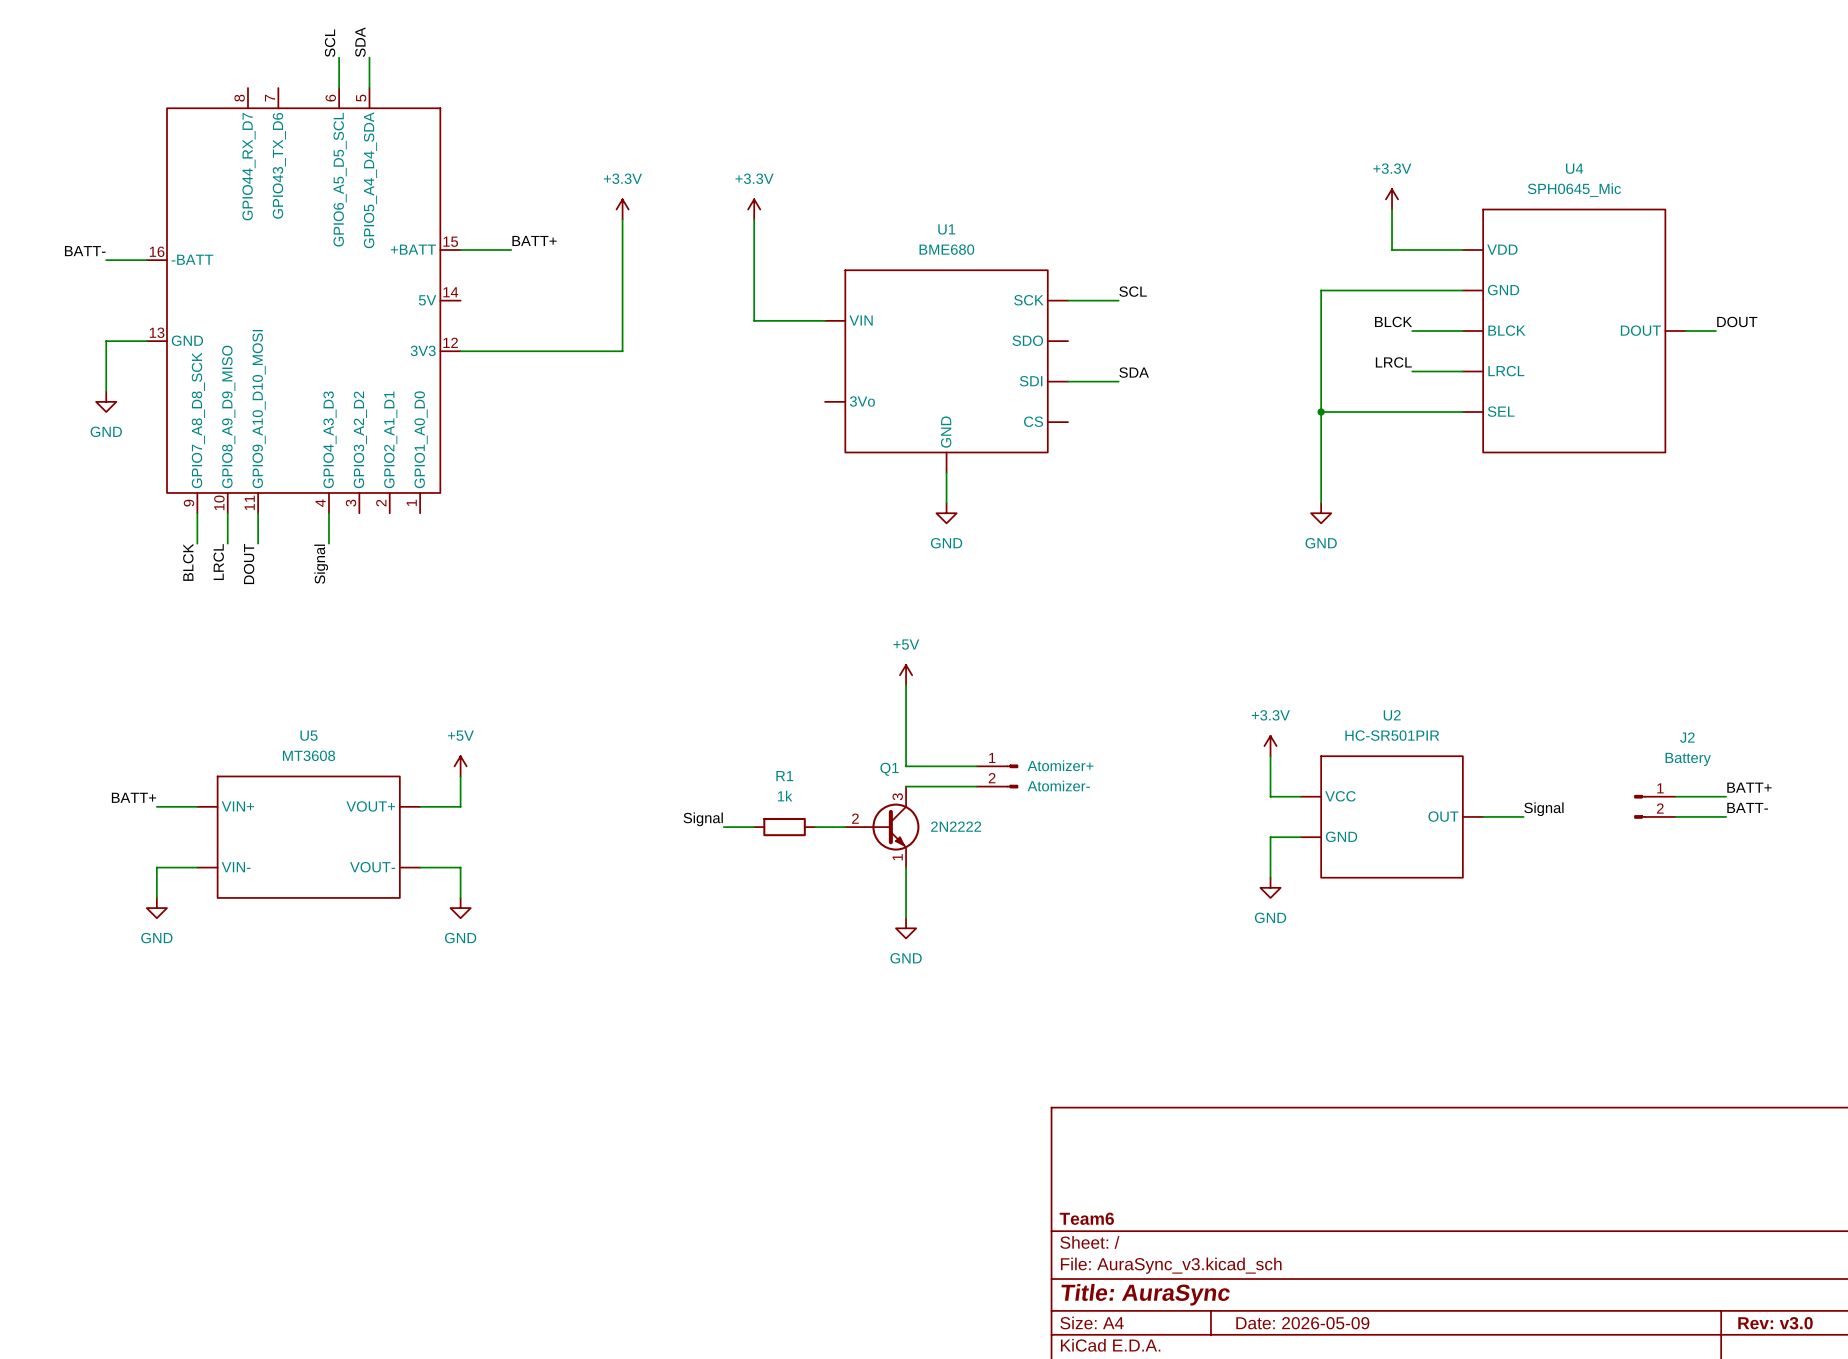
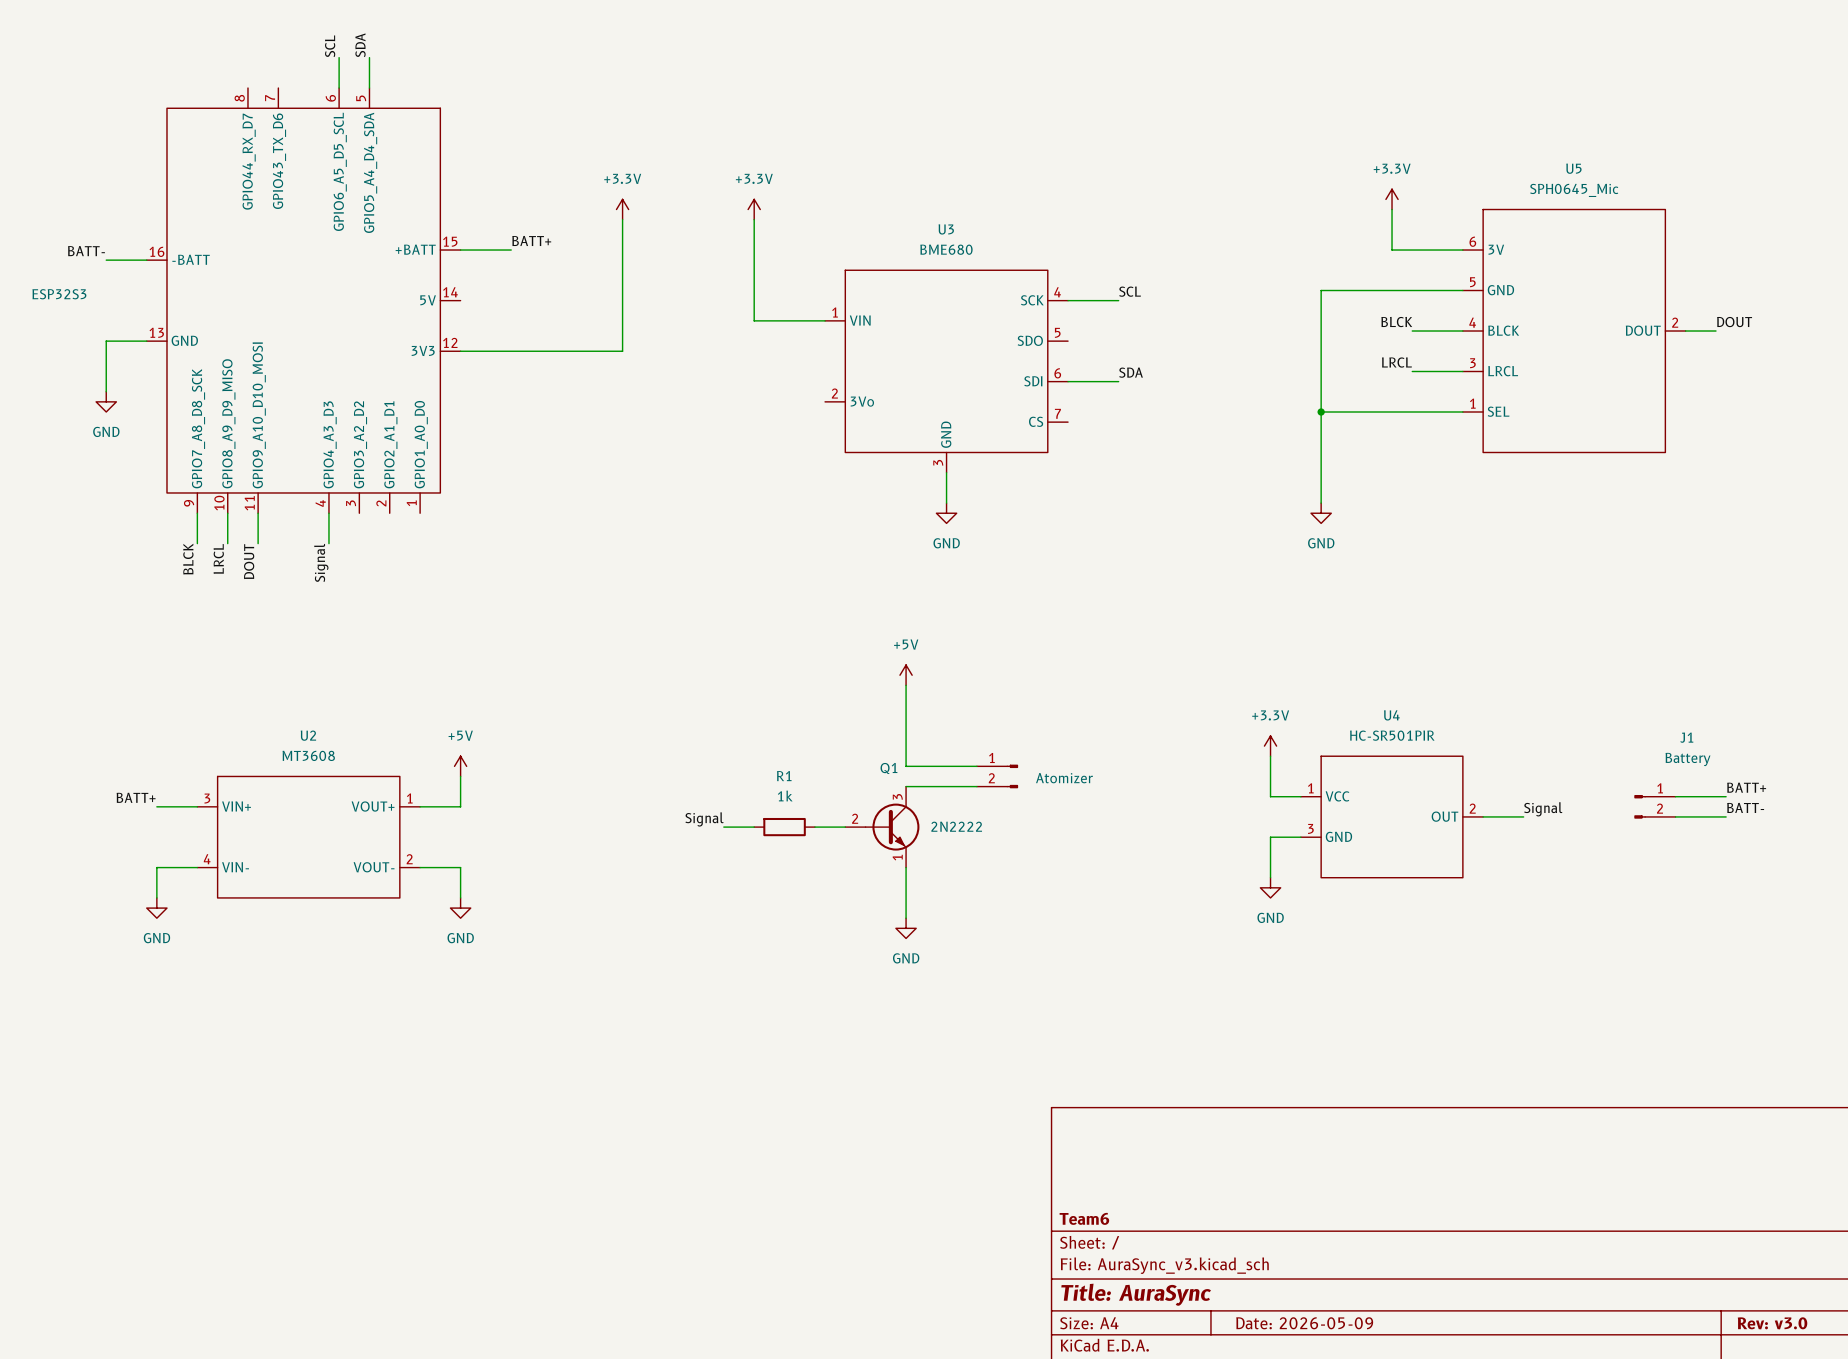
U4 name position: U4 (1574, 168) -> U4 (1391, 715)
U4 symbol: [1462, 209, 1686, 453] -> [1300, 756, 1484, 878]
U1 name: U1 (946, 229) -> U3 (946, 229)
U1 pin number: none -> 4 (1057, 292)
part value: none -> ESP32S3 (59, 294)
U1 pin number: none -> 1 (835, 312)
U1 pin number: none -> 5 (1057, 332)
U1 pin number: none -> 6 (1057, 373)
U1 pin number: none -> 2 (834, 393)
U1 pin number: none -> 7 (1057, 413)
U1 pin number: none -> 3 (938, 462)
U5 name position: U5 (308, 735) -> U5 (1573, 168)
J2 name: J2 (1687, 737) -> J1 (1686, 737)
U2 symbol: [1300, 756, 1484, 878] -> [197, 776, 421, 898]
Atomizer- value: Atomizer+ (1060, 765) -> Atomizer (1064, 778)
U5 symbol: [197, 776, 421, 898] -> [1462, 209, 1686, 453]
Atomizer- name: Atomizer- (1058, 786) -> none

